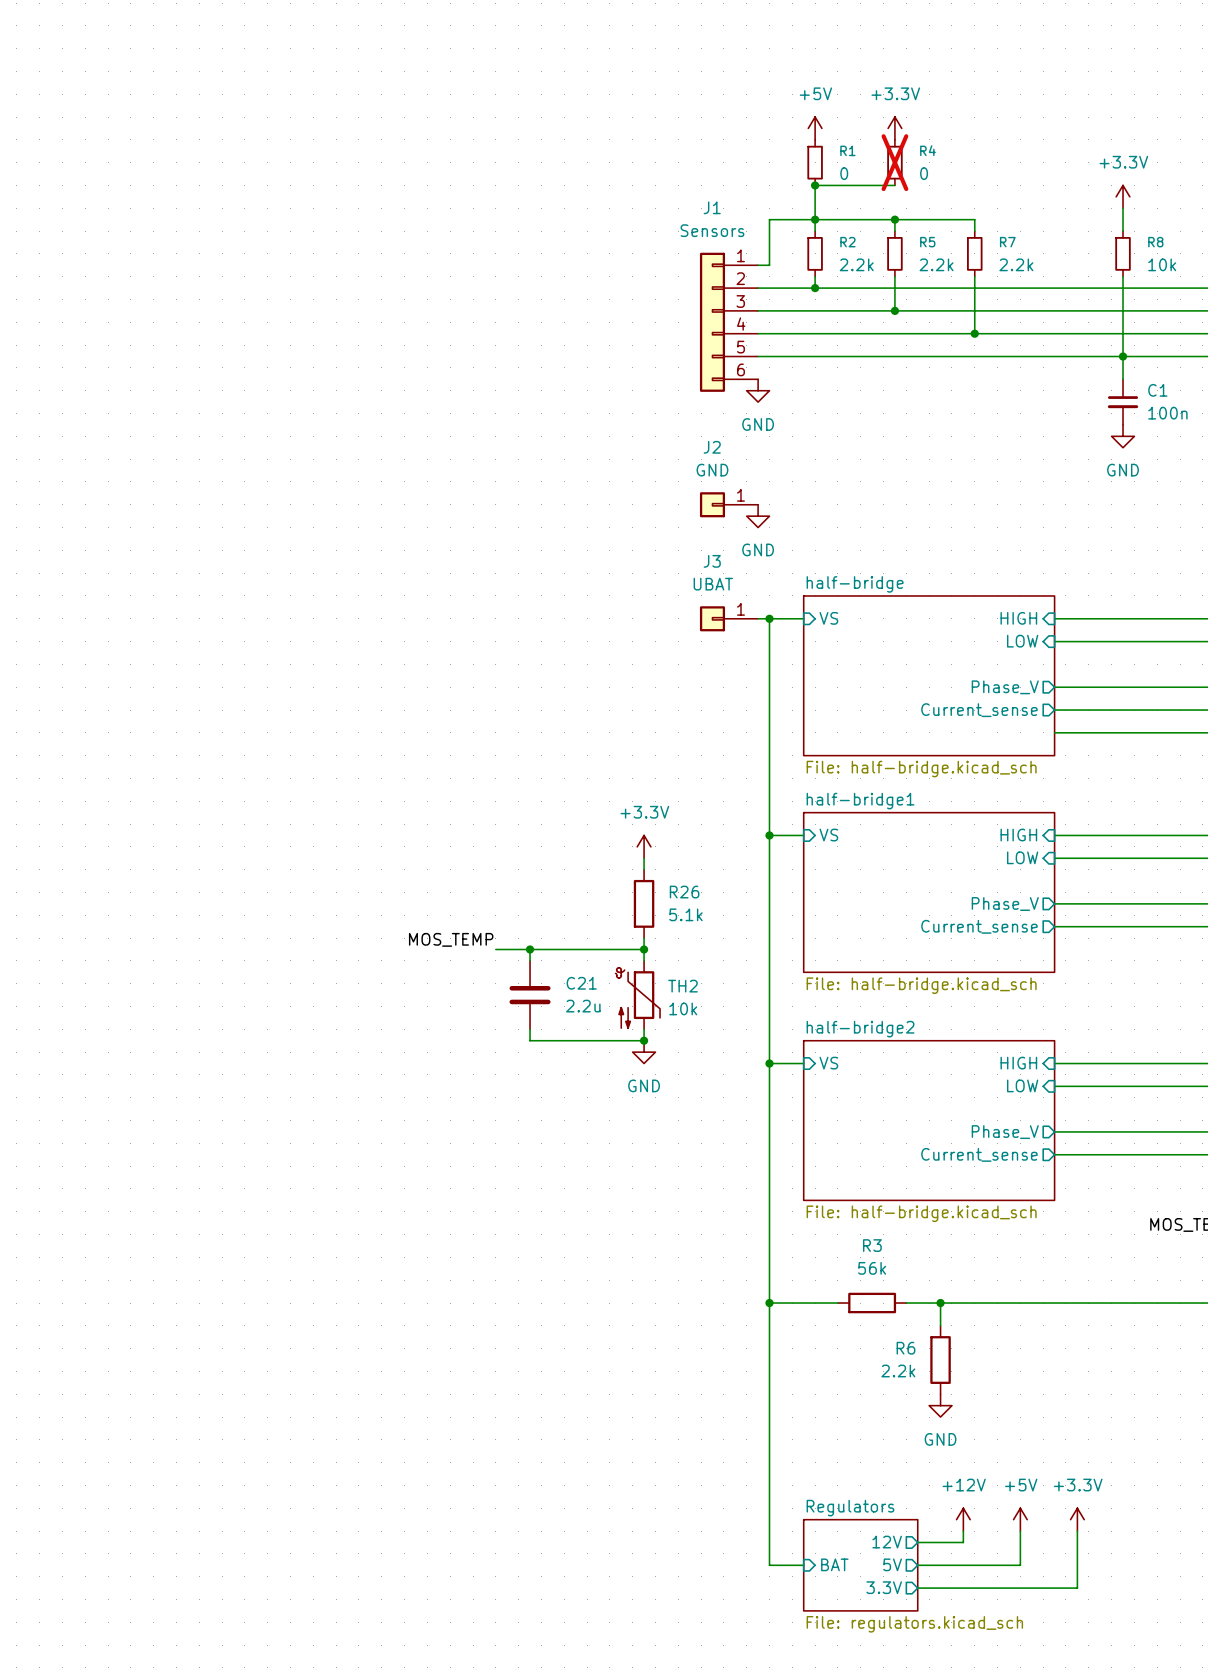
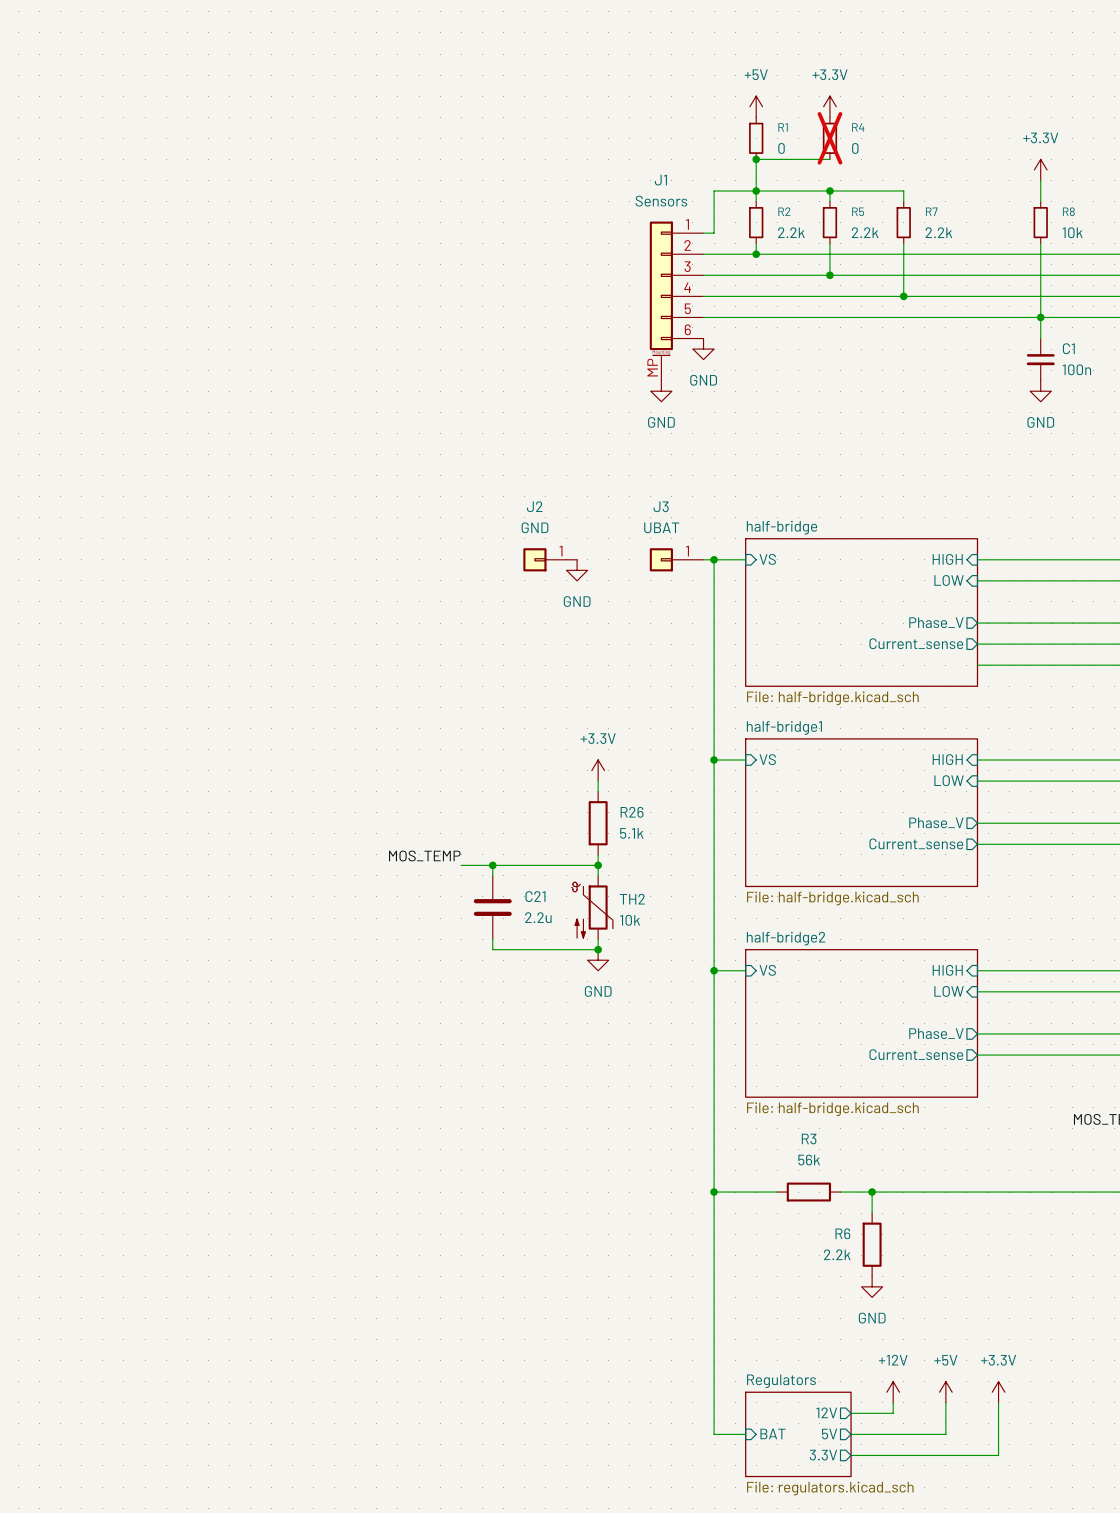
J1 symbol: [699, 252, 759, 392] -> [649, 221, 704, 381]
power symbol: none -> GND (661, 391)
J2 position: (729, 504) -> (550, 559)
power symbol: GND (758, 516) -> none
power symbol: none -> GND (577, 570)

